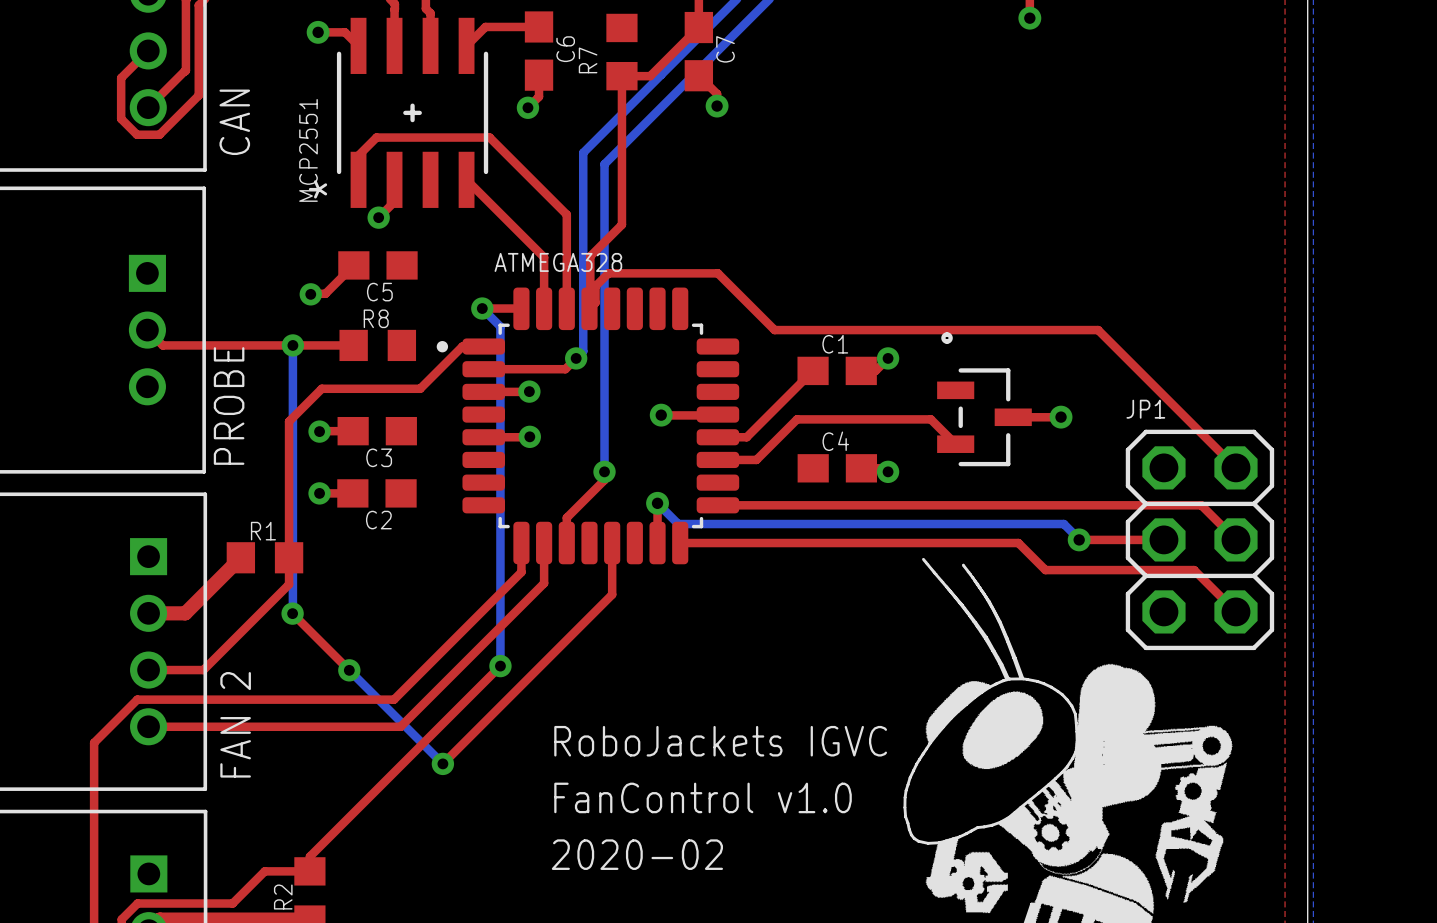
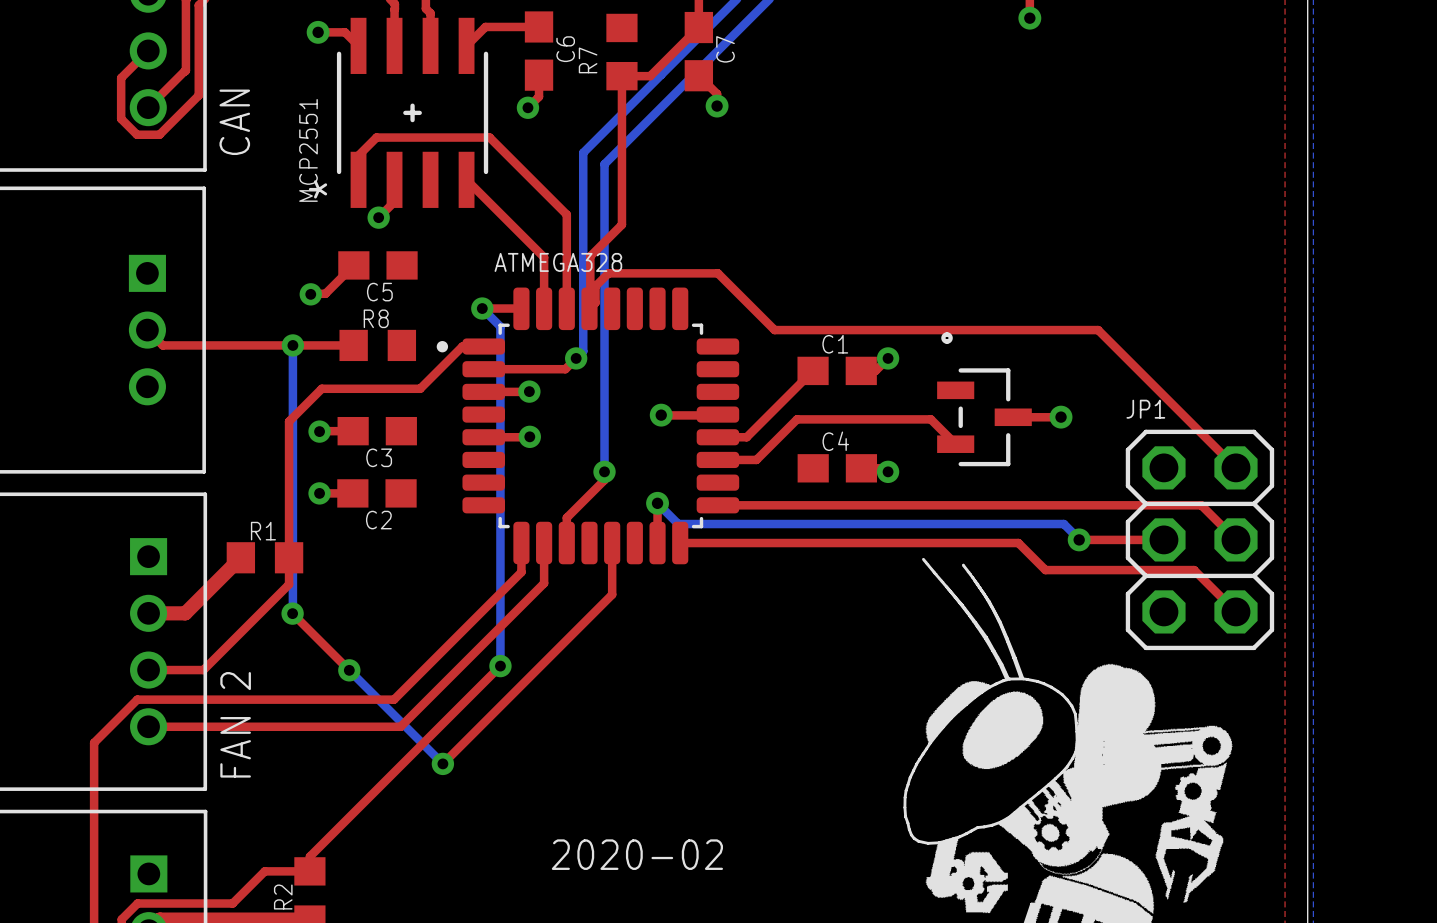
text: PROBE (229, 405) -> none
text: RoboJackets IGVC (720, 741) -> none
text: FanControl v1.0 (703, 797) -> none

